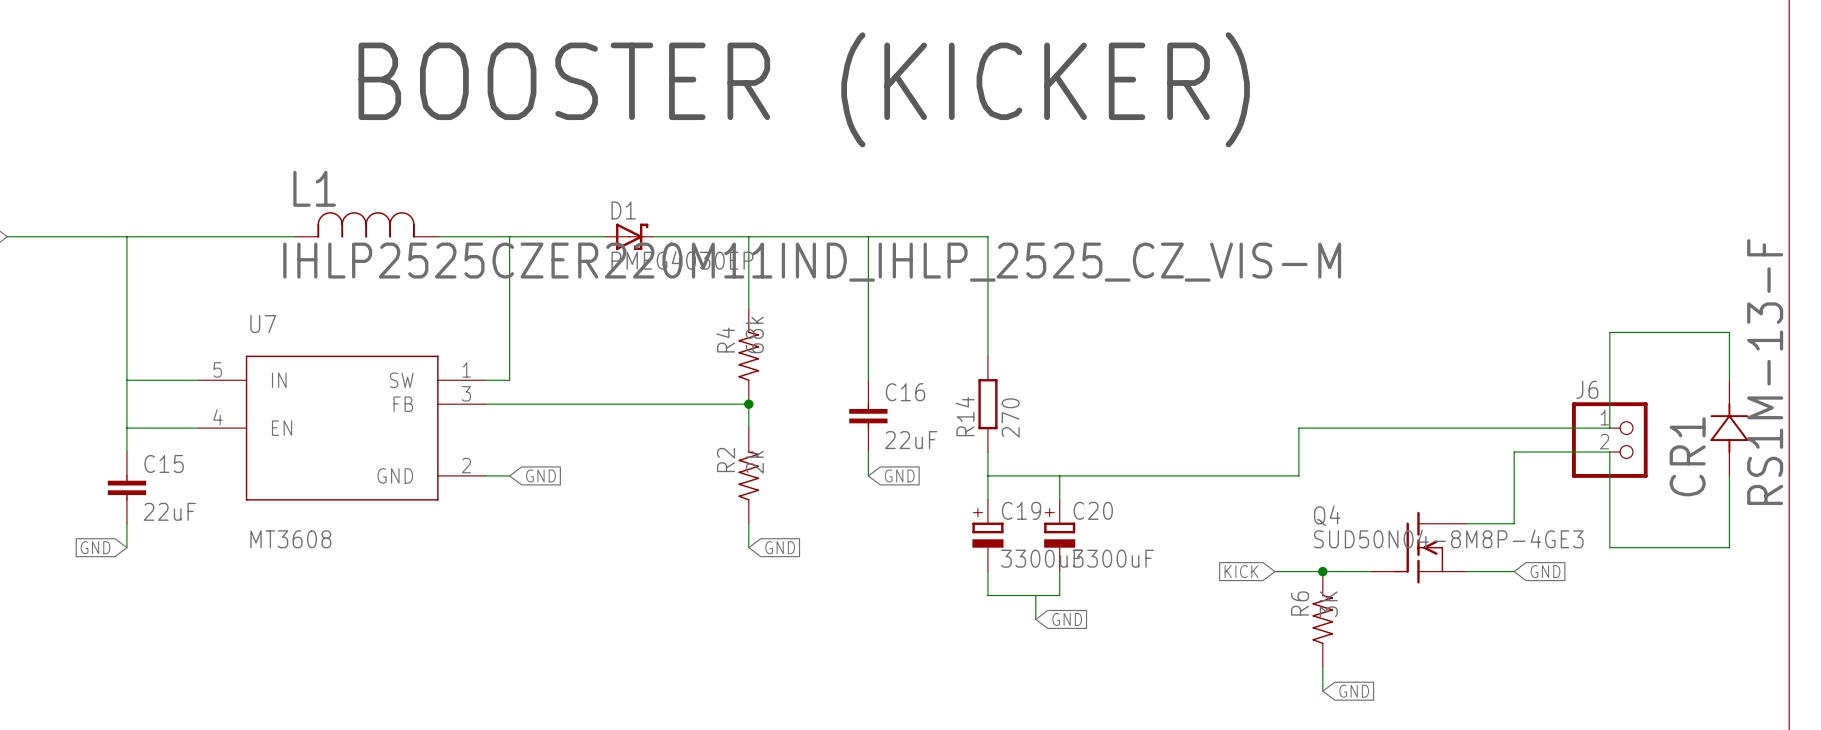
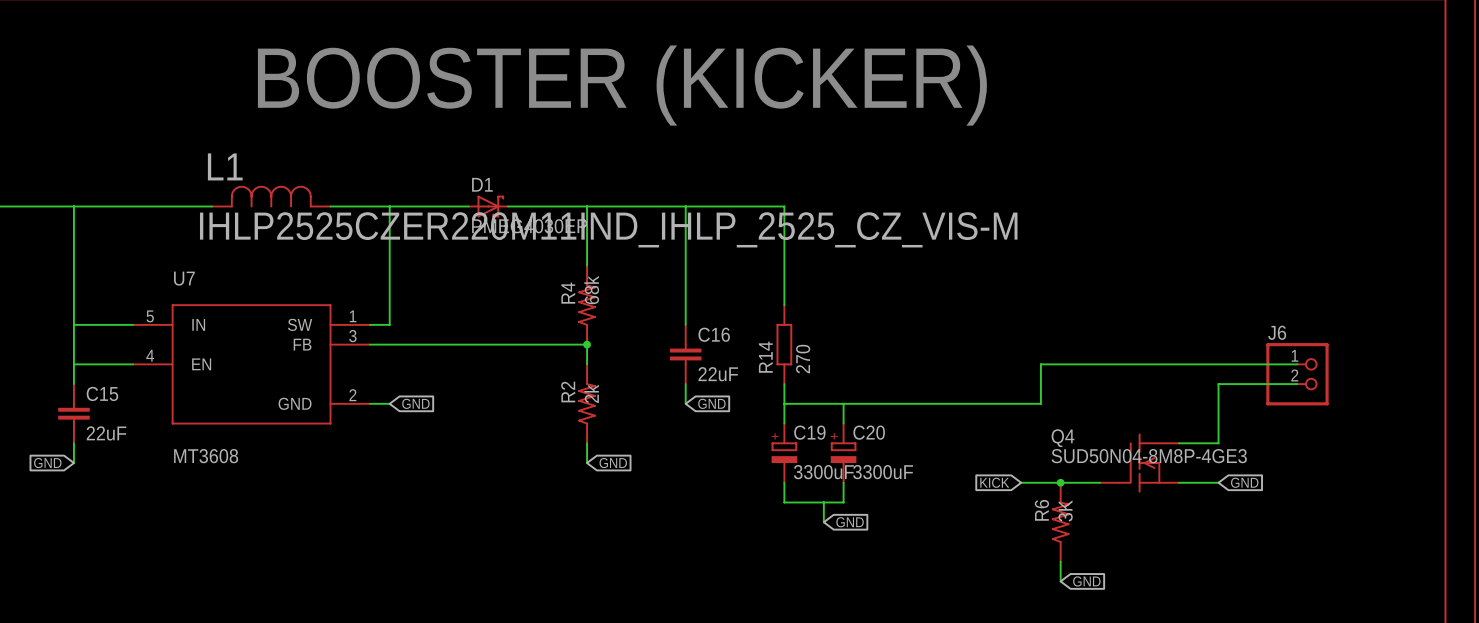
wire: (1729, 380) (1729, 332) (1609, 332) (1609, 428) -> none
CR1: RS1M-13-F (1729, 428) -> none
wire: (1609, 452) (1609, 547) (1729, 547) (1729, 475) -> none

